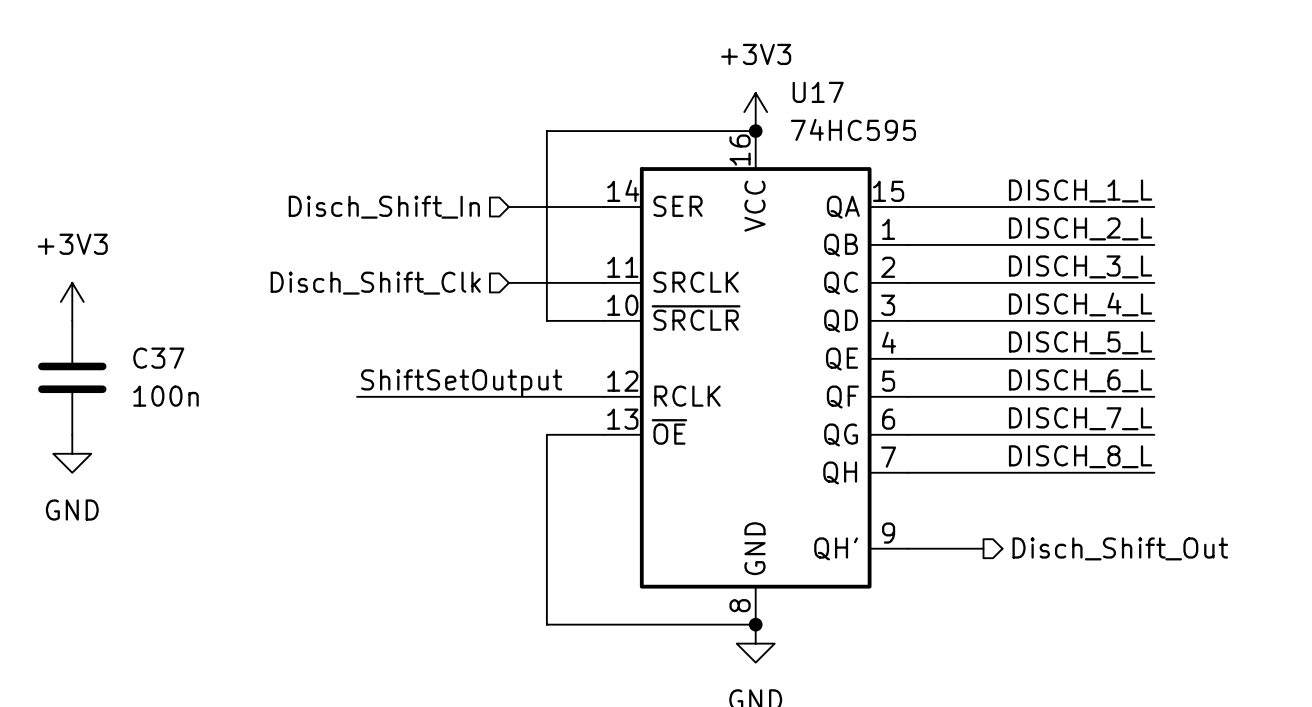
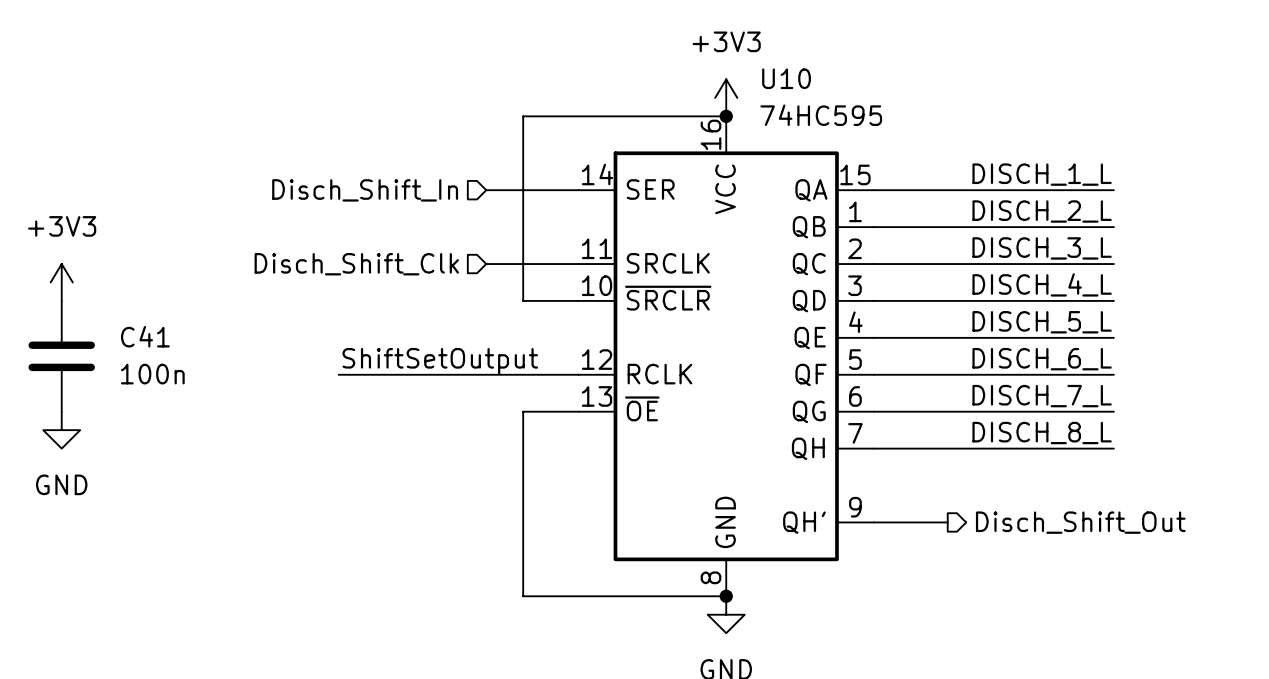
U17 name: U17 (818, 92) -> U10 (786, 78)
C37 name: C37 (158, 358) -> C41 (145, 336)

